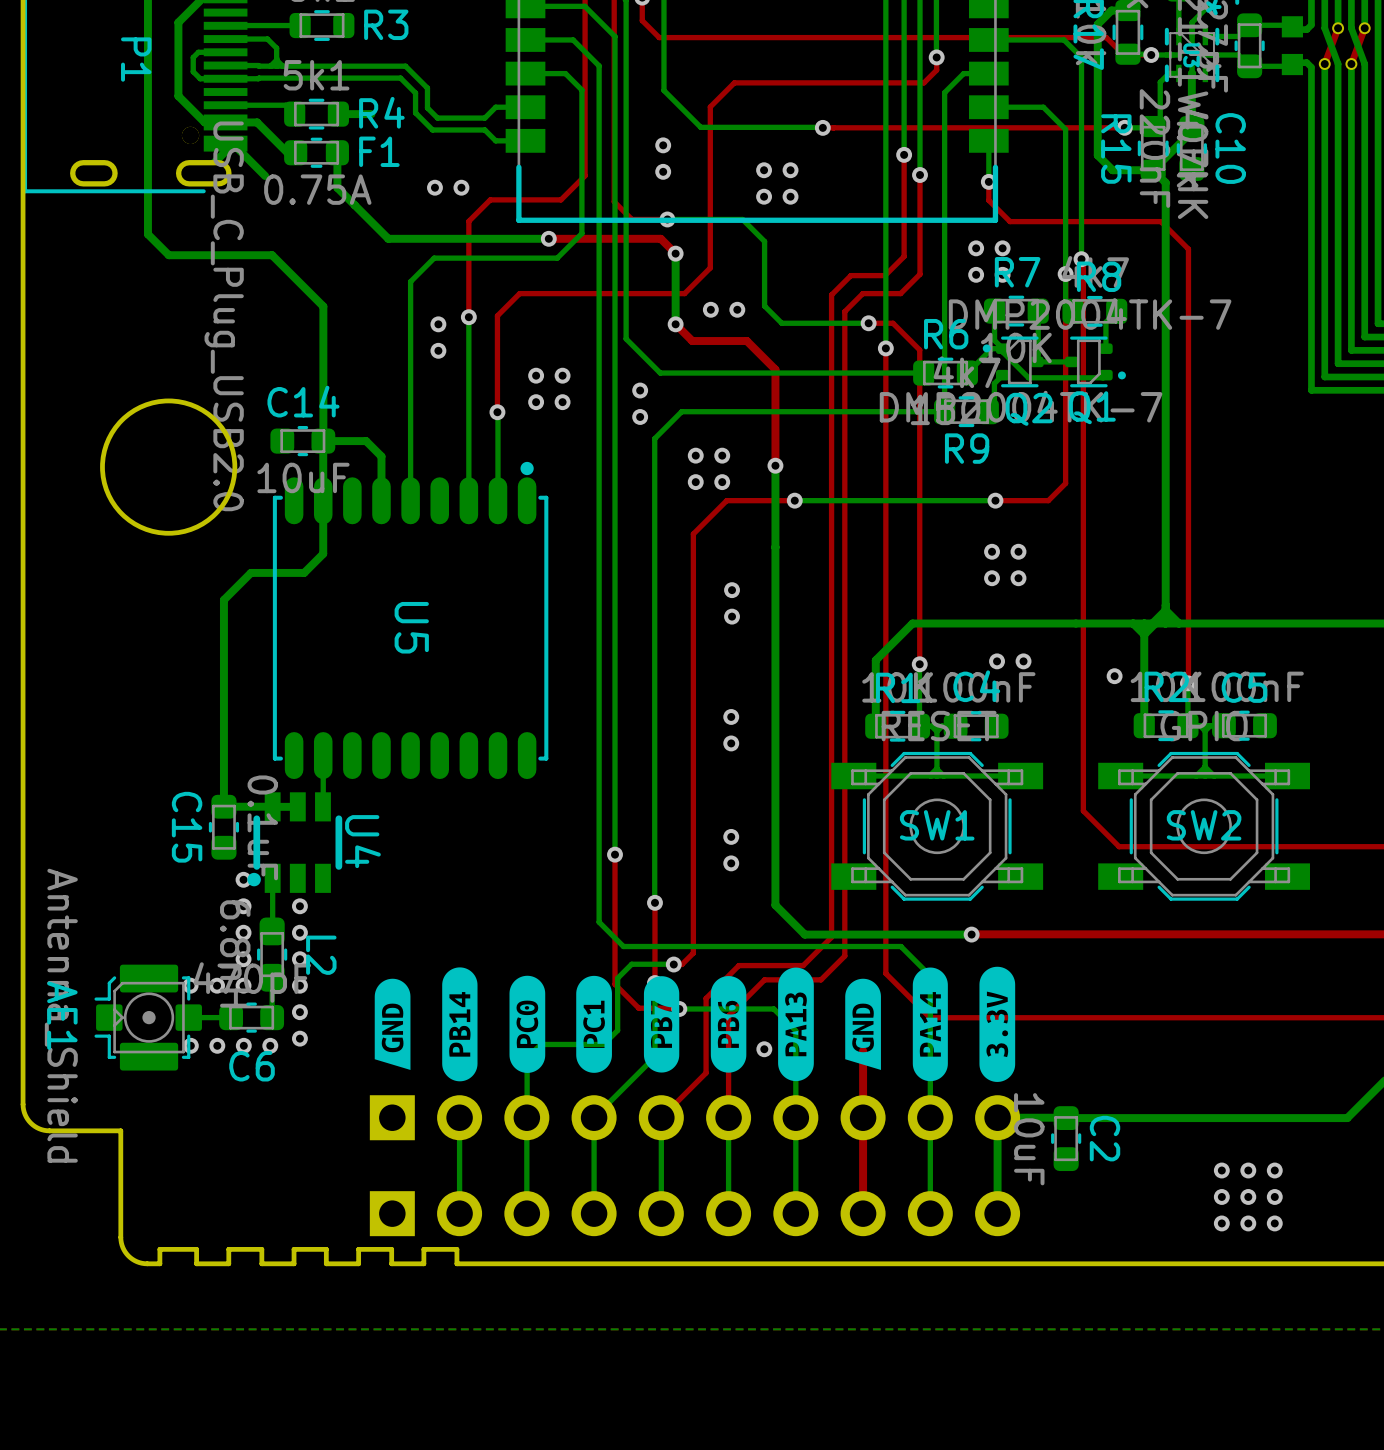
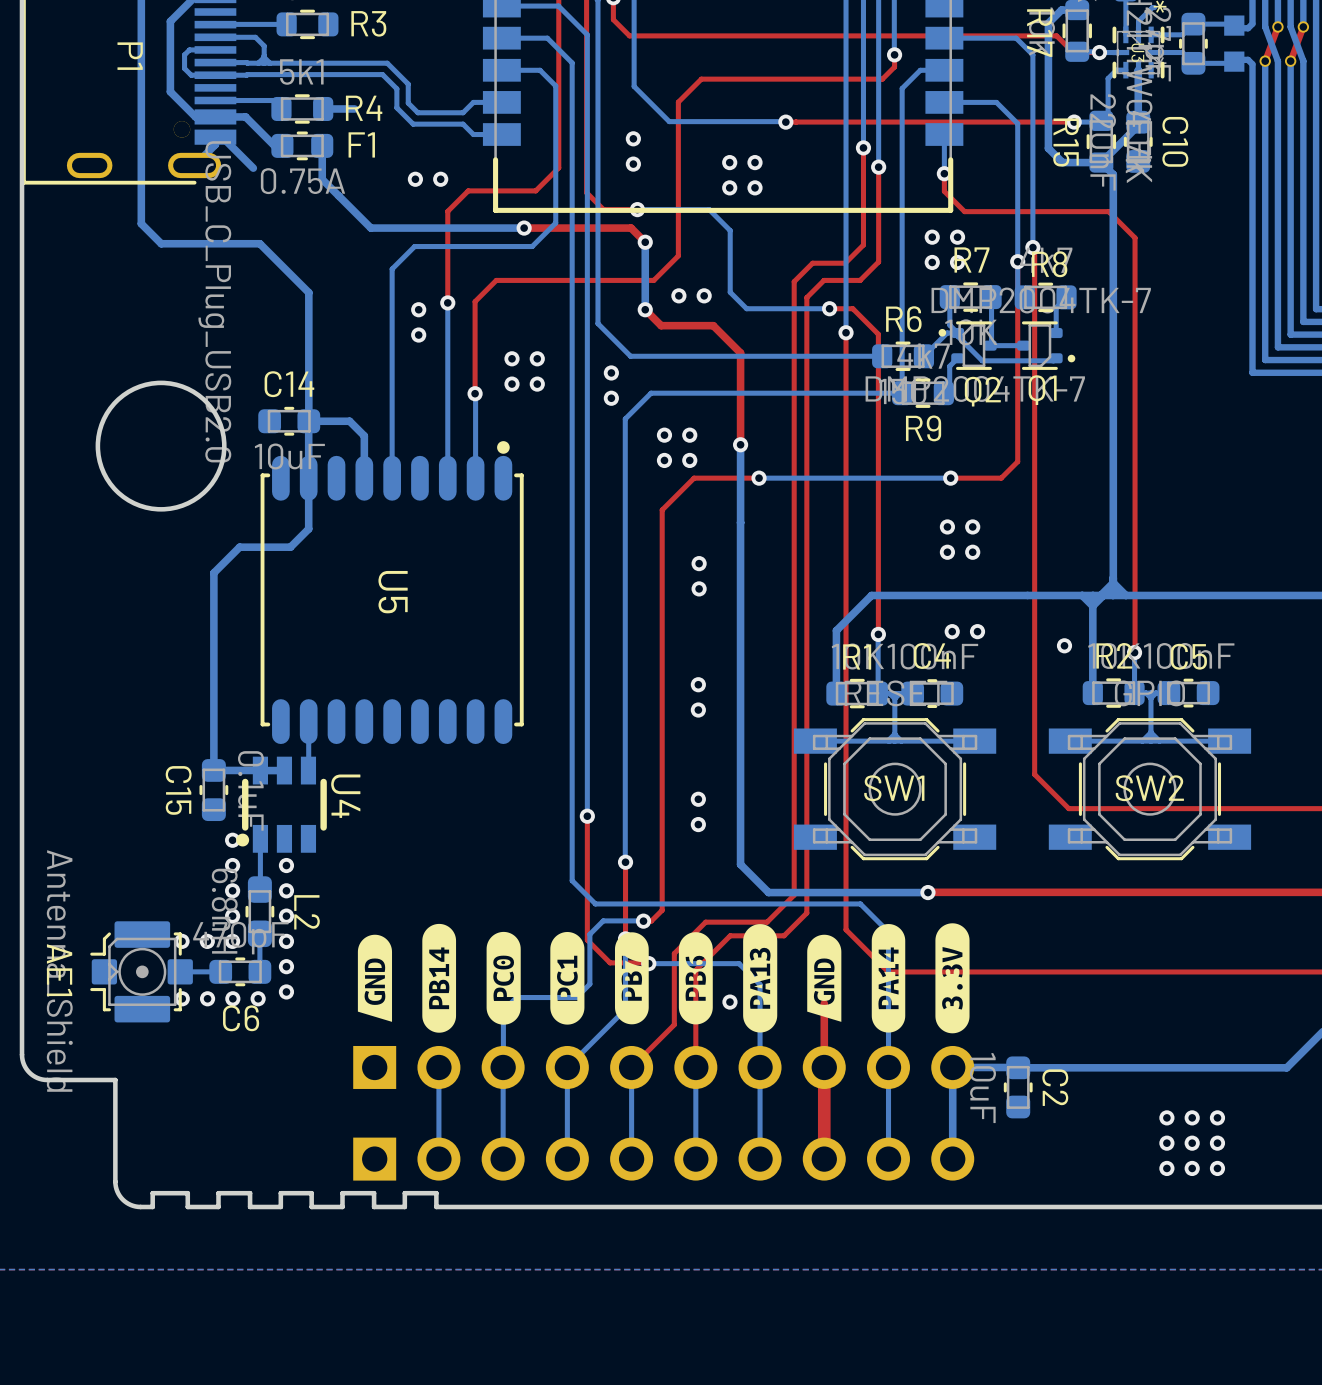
top track width: thin (863, 1117) (863, 1213) -> thick (824, 1067) (824, 1159)

